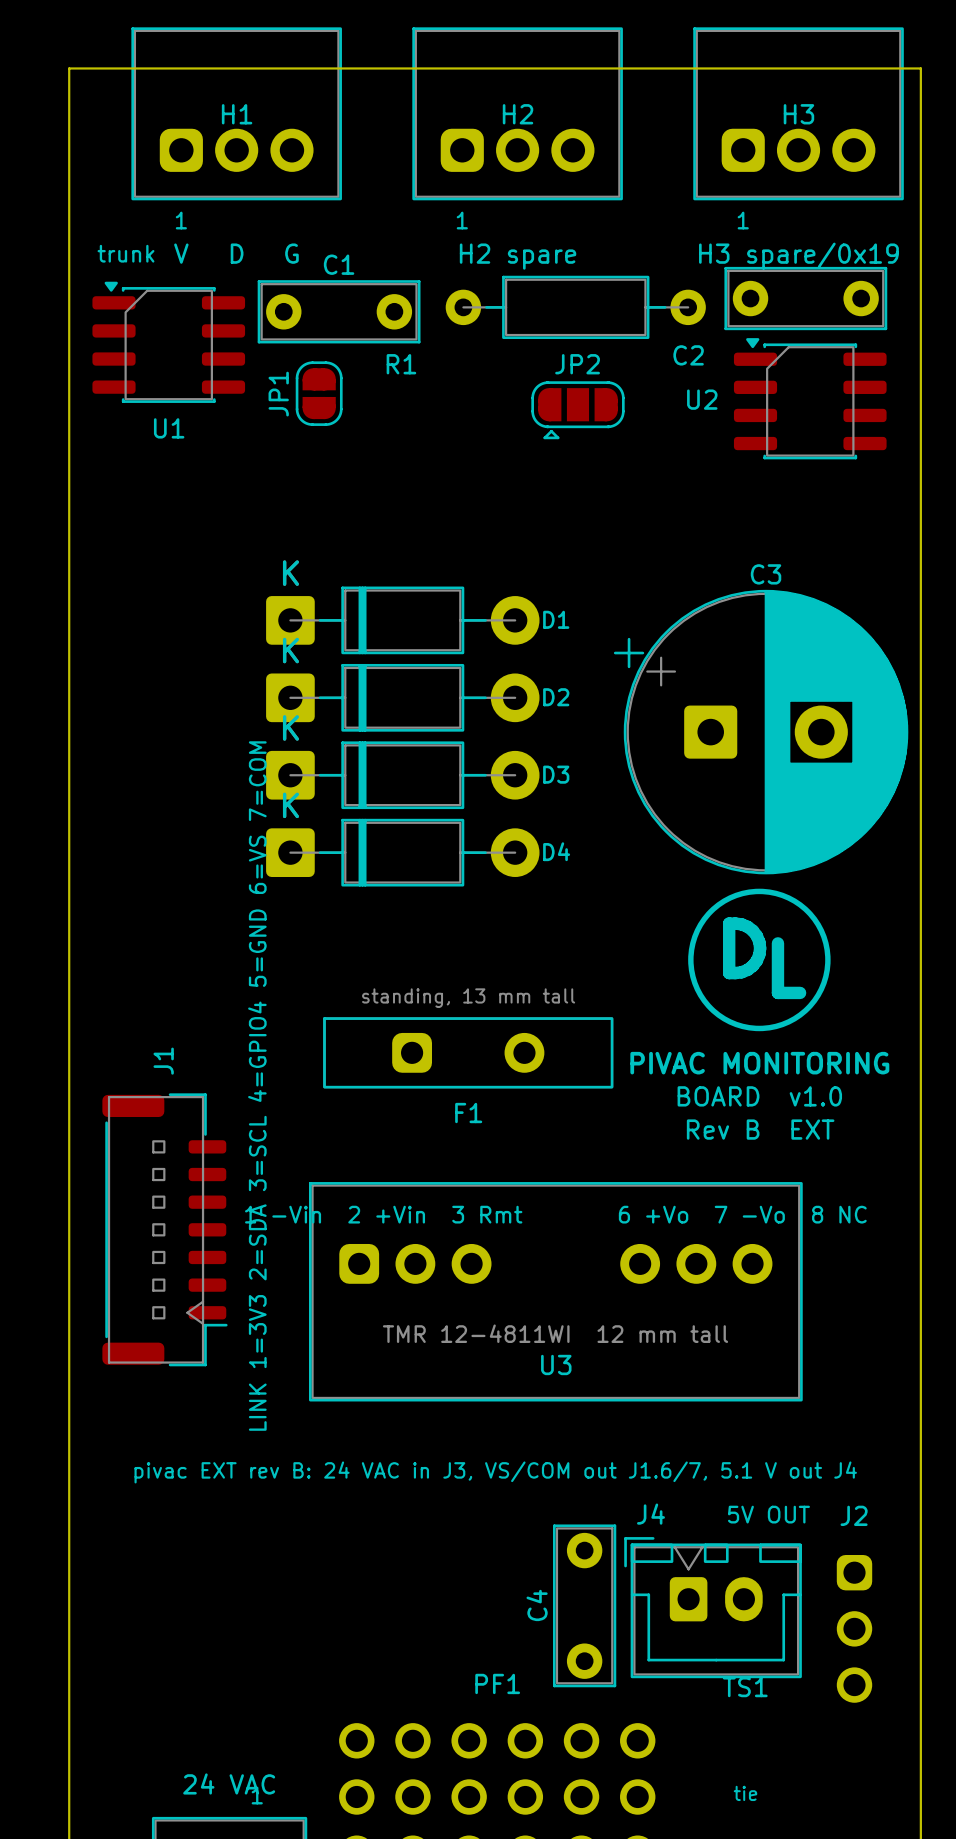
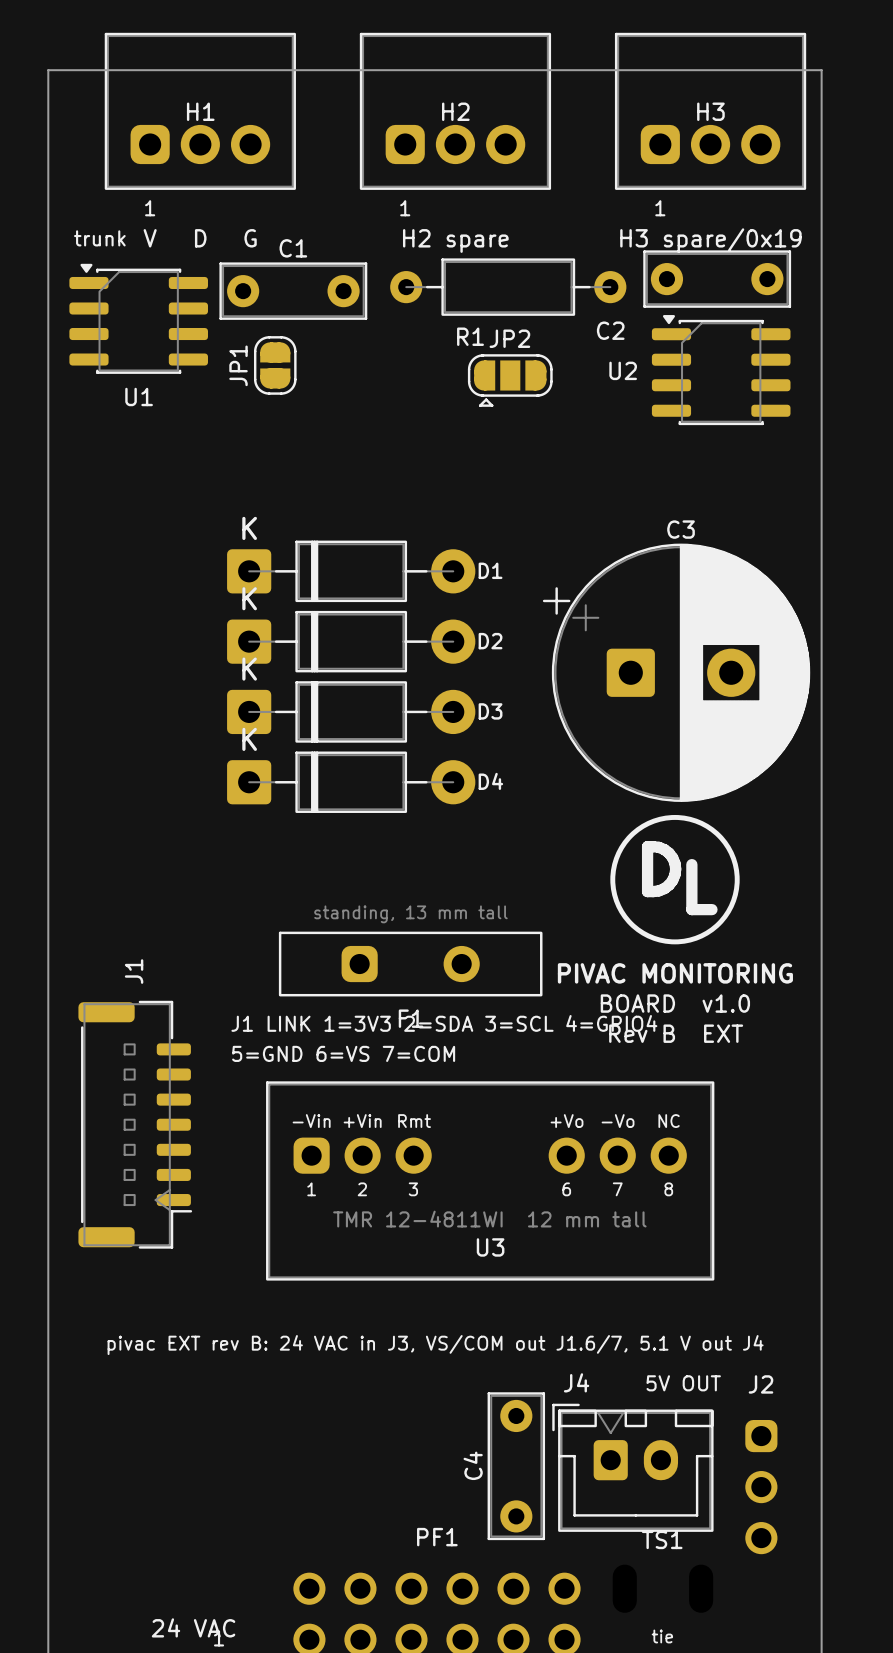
R1 name position: R1 (401, 364) -> R1 (470, 336)
text: LINK 1=3V3 2=SDA 3=SCL 4=GPIO4 5=GND 6=VS 7=COM (257, 1086) -> J1 LINK 1=3V3 2=SDA 3=SCL 4=GPIO4 (444, 1023)
text: none -> 5=GND 6=VS 7=COM (343, 1053)
U3 footprint: [309, 1182, 803, 1402] -> [266, 1081, 715, 1281]

